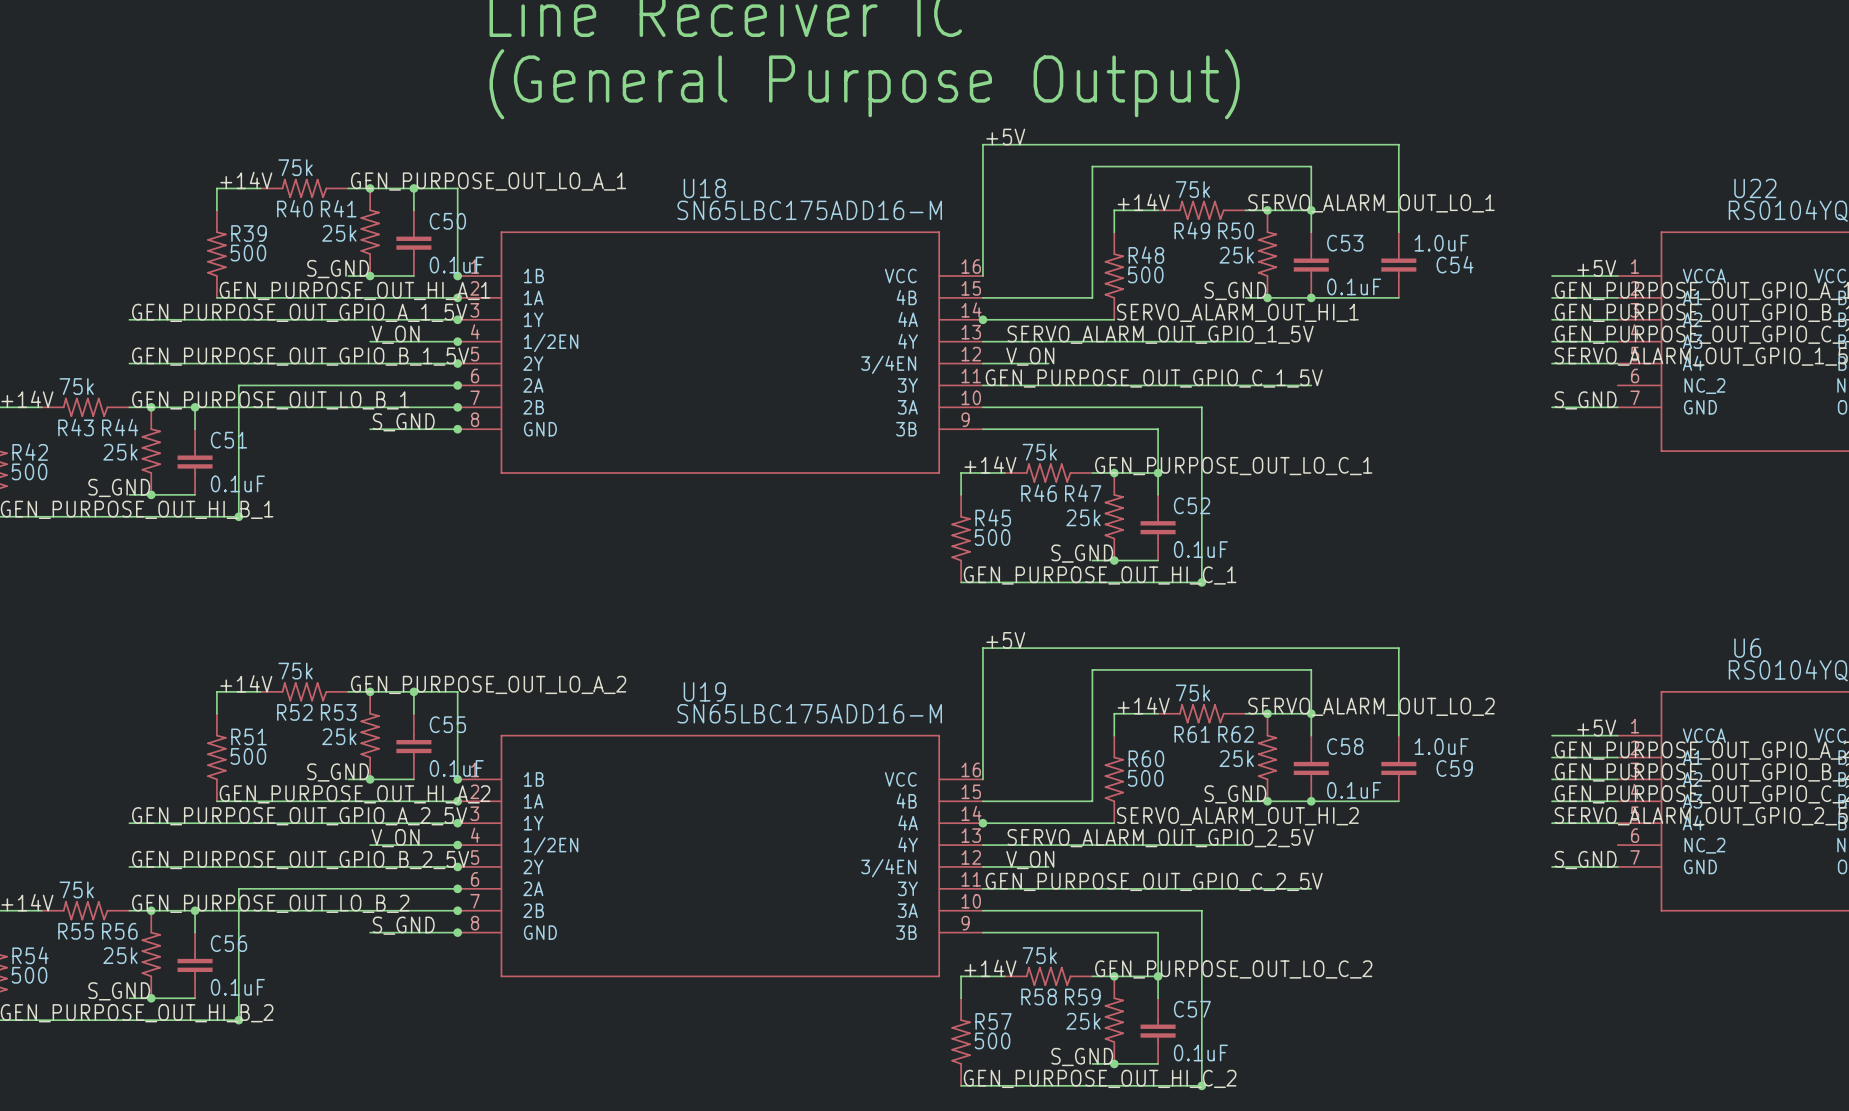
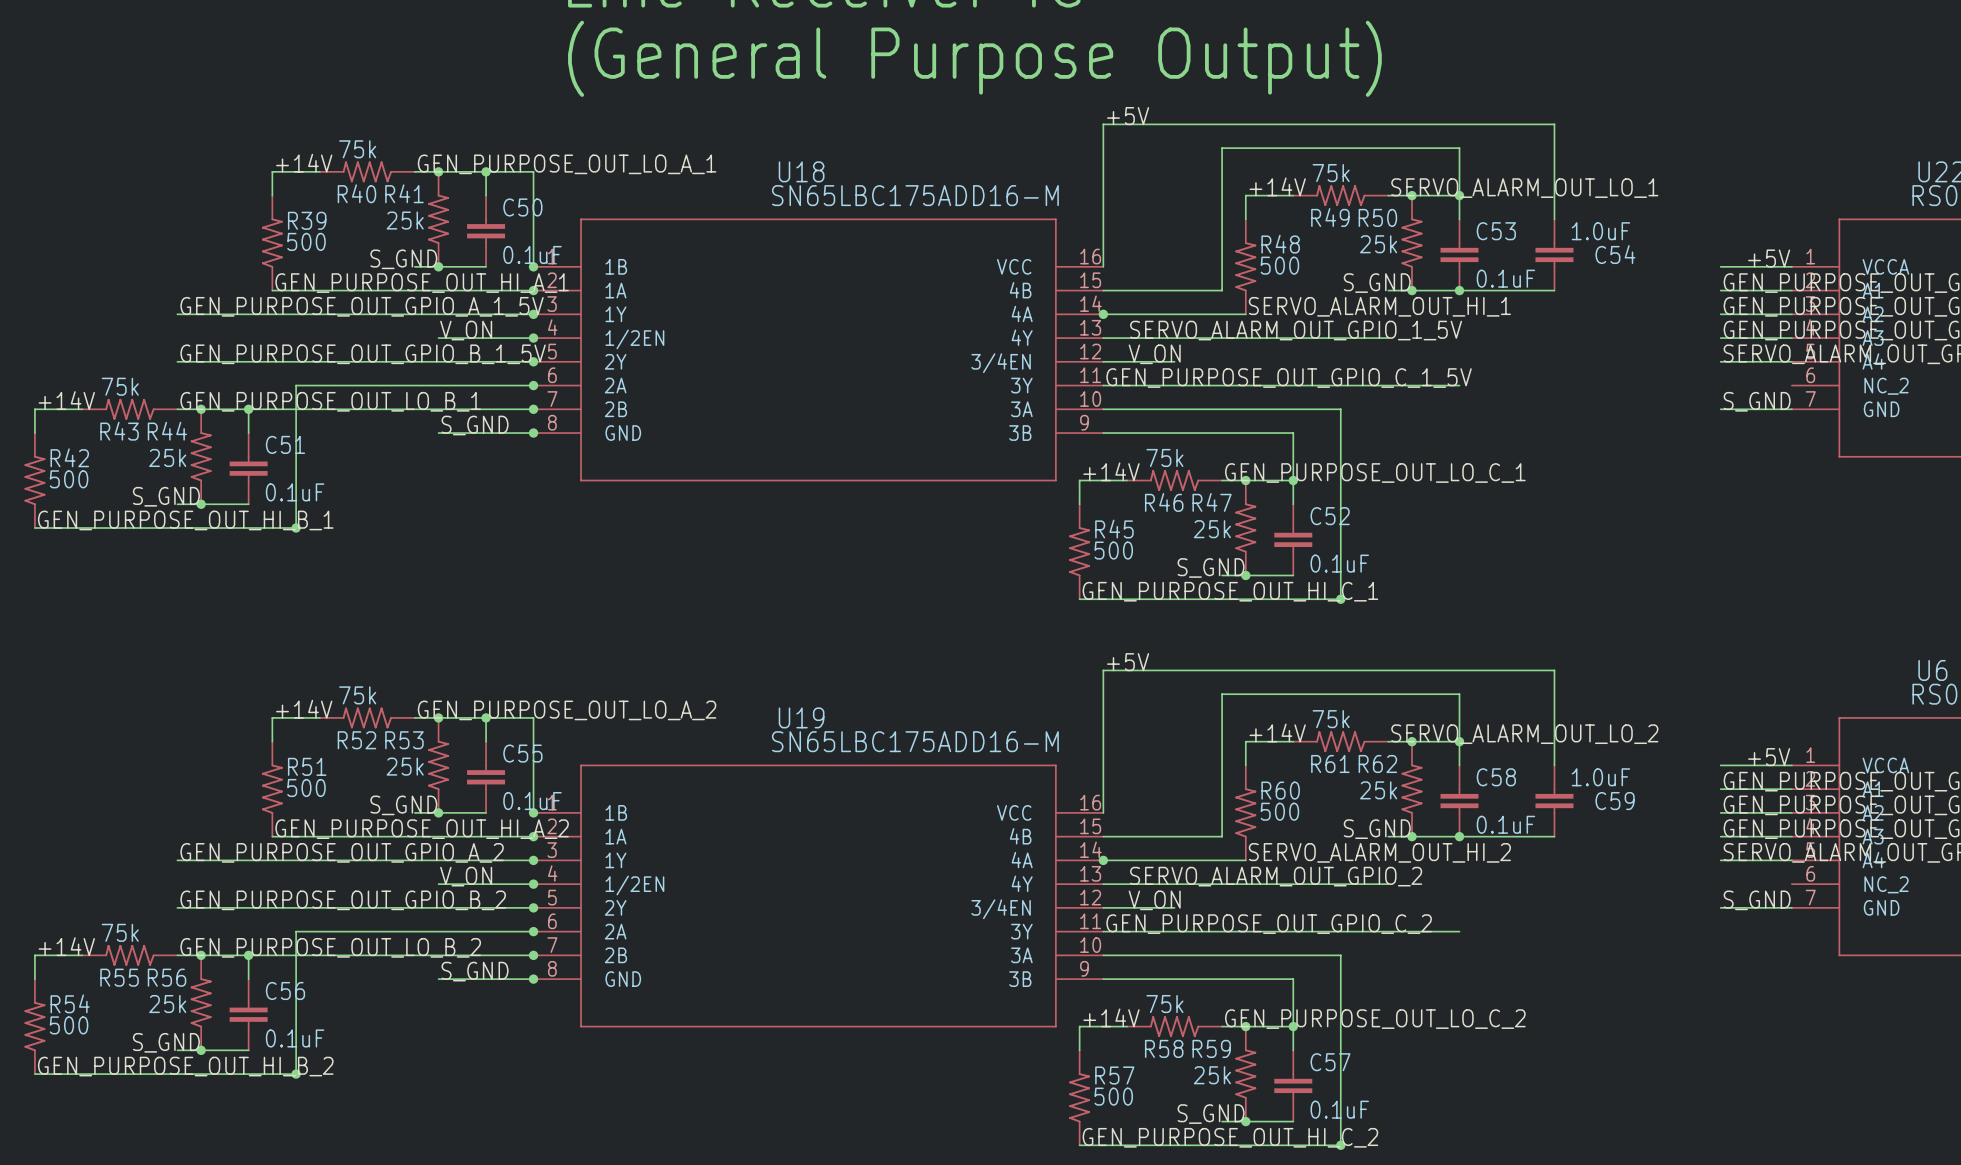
label: GEN_PURPOSE_OUT_GPIO_A_2_5V (299, 816) -> GEN_PURPOSE_OUT_GPIO_A_2 (342, 852)
label: SERVO_ALARM_OUT_GPIO_2_5V (1160, 838) -> SERVO_ALARM_OUT_GPIO_2 (1276, 876)
label: GEN_PURPOSE_OUT_GPIO_B_2_5V (300, 860) -> GEN_PURPOSE_OUT_GPIO_B_2 (343, 900)
label: GEN_PURPOSE_OUT_GPIO_C_2_5V (1154, 881) -> GEN_PURPOSE_OUT_GPIO_C_2 (1269, 924)

